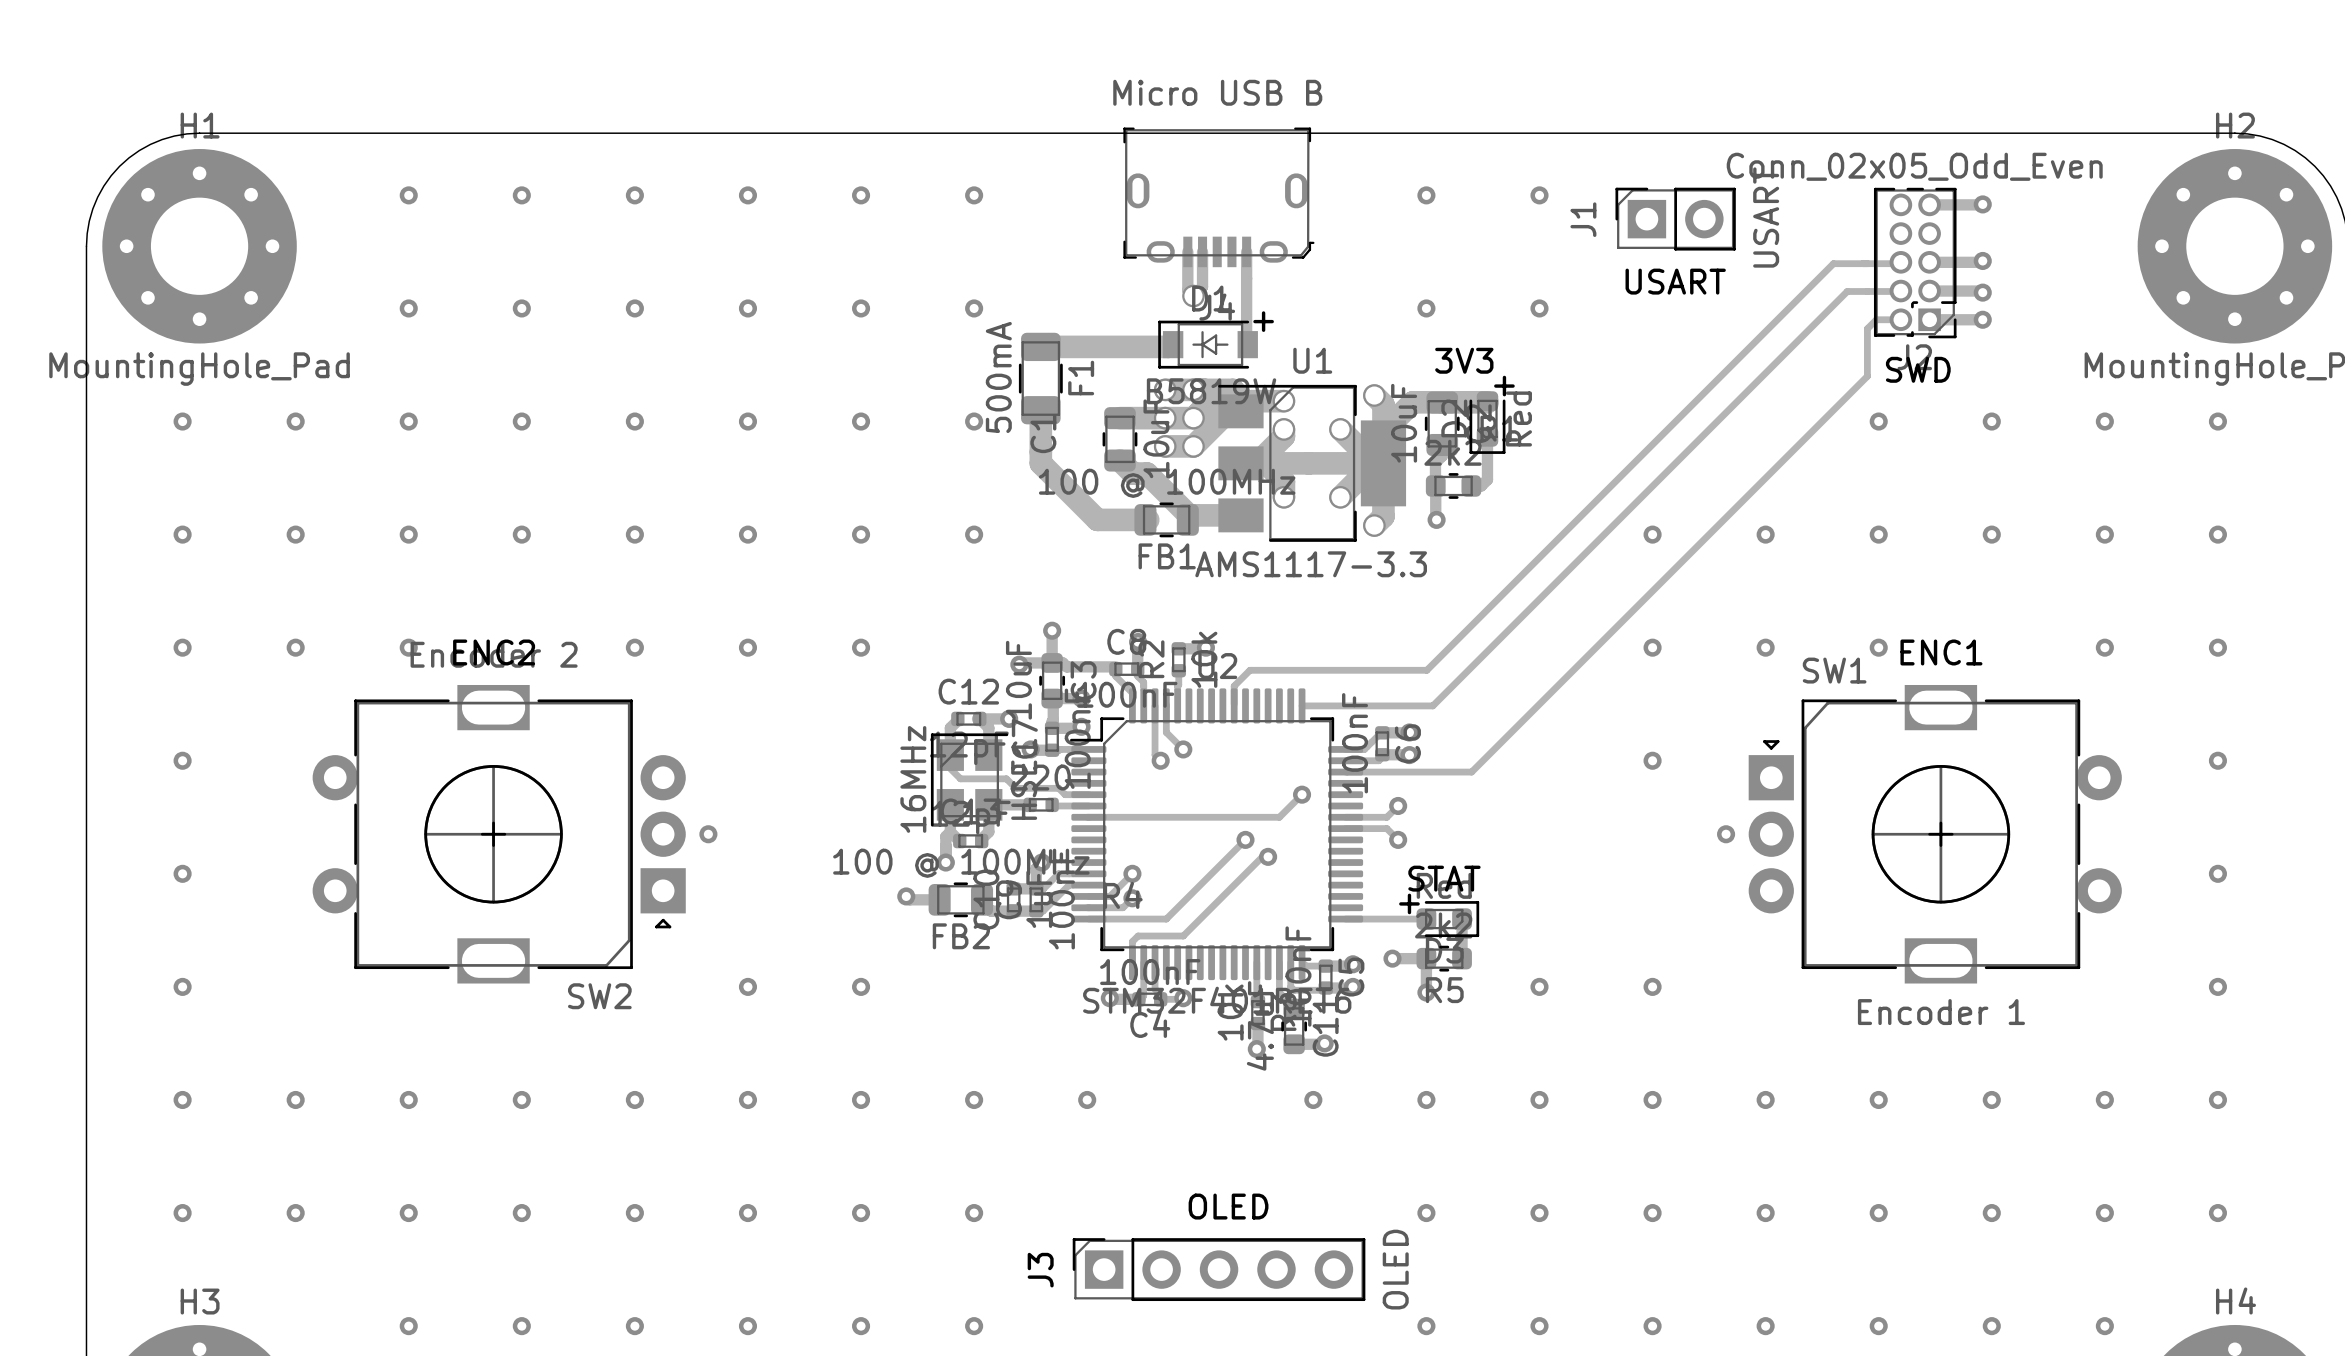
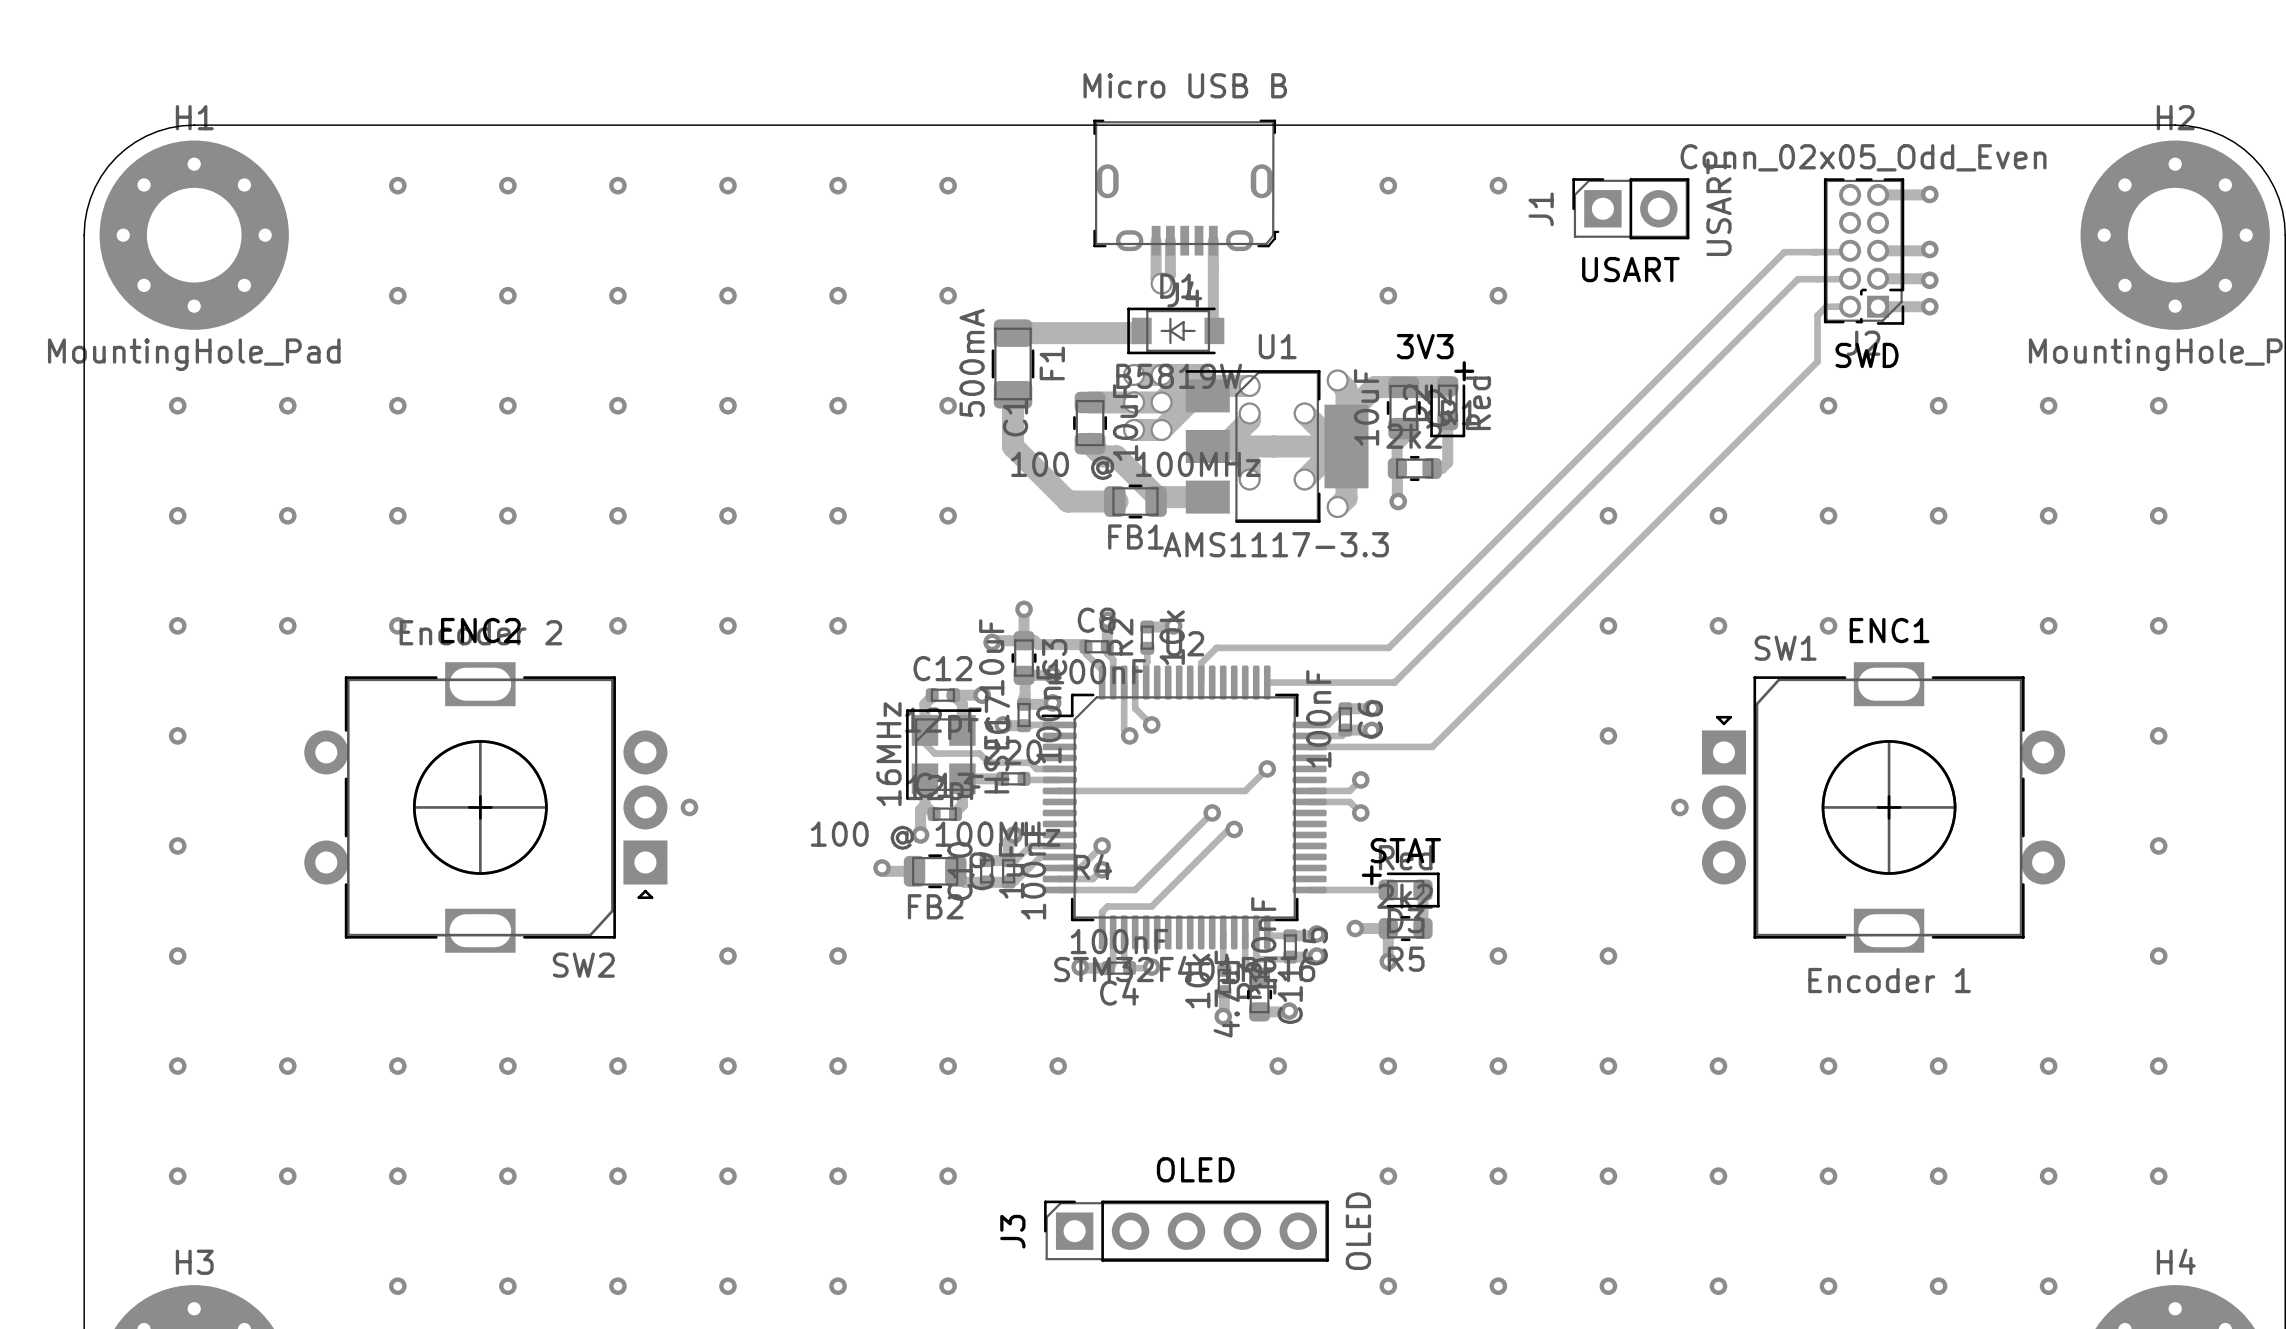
text: + (1263, 321) -> none

